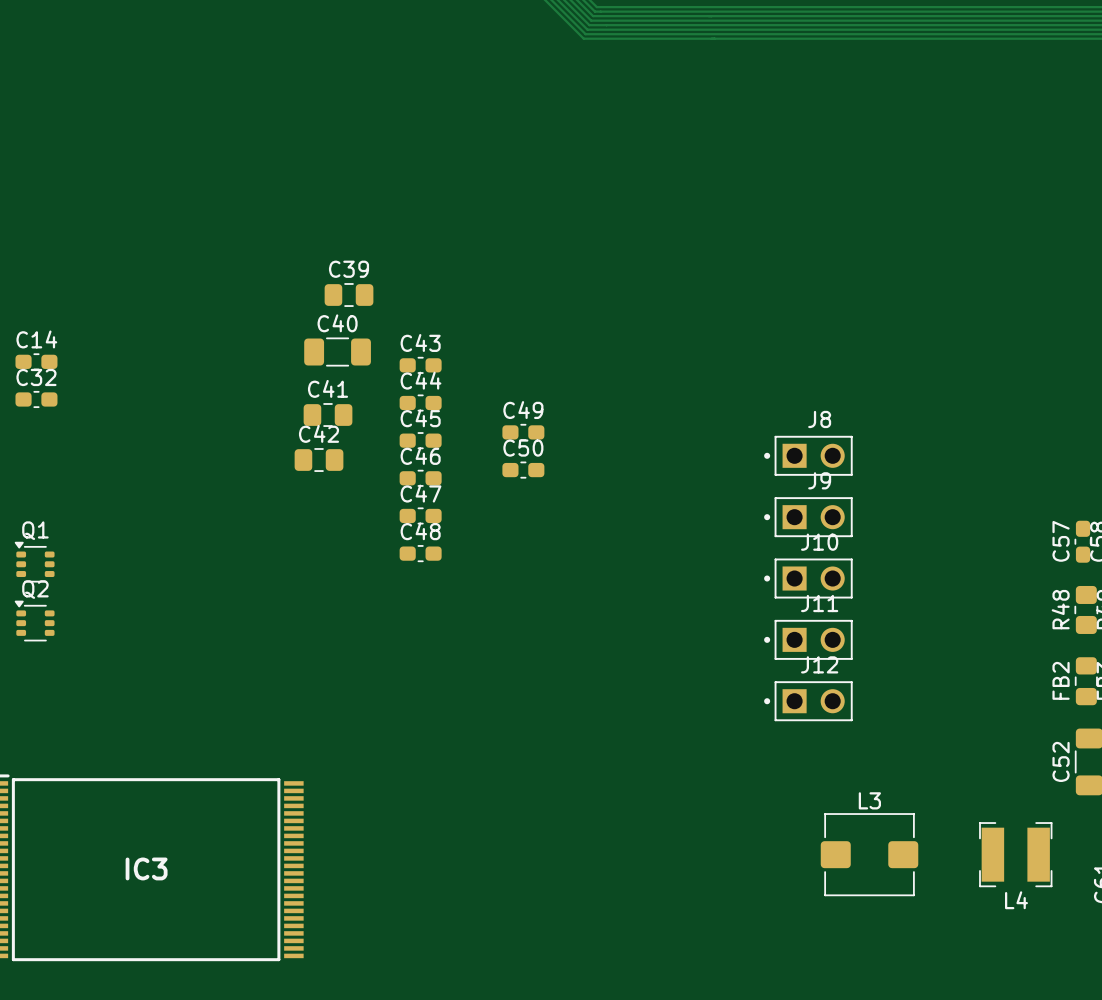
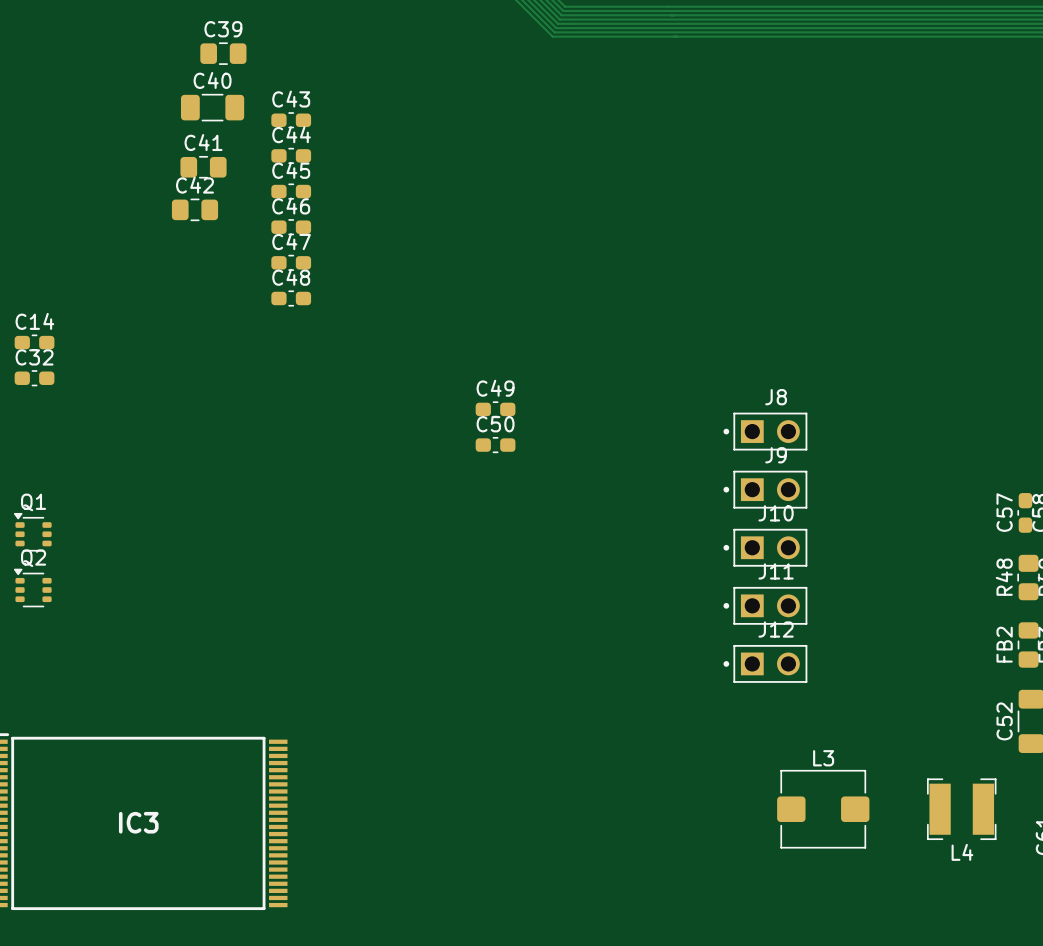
C39 position: (349, 295) -> (223, 53)
C40 position: (337, 352) -> (212, 107)
C43 position: (420, 365) -> (291, 120)
C44 position: (420, 403) -> (291, 155)
C41 position: (328, 415) -> (203, 167)
C45 position: (420, 440) -> (291, 191)
C42 position: (319, 460) -> (194, 209)
C46 position: (420, 478) -> (291, 227)
C47 position: (420, 515) -> (291, 262)
C48 position: (420, 553) -> (291, 298)

